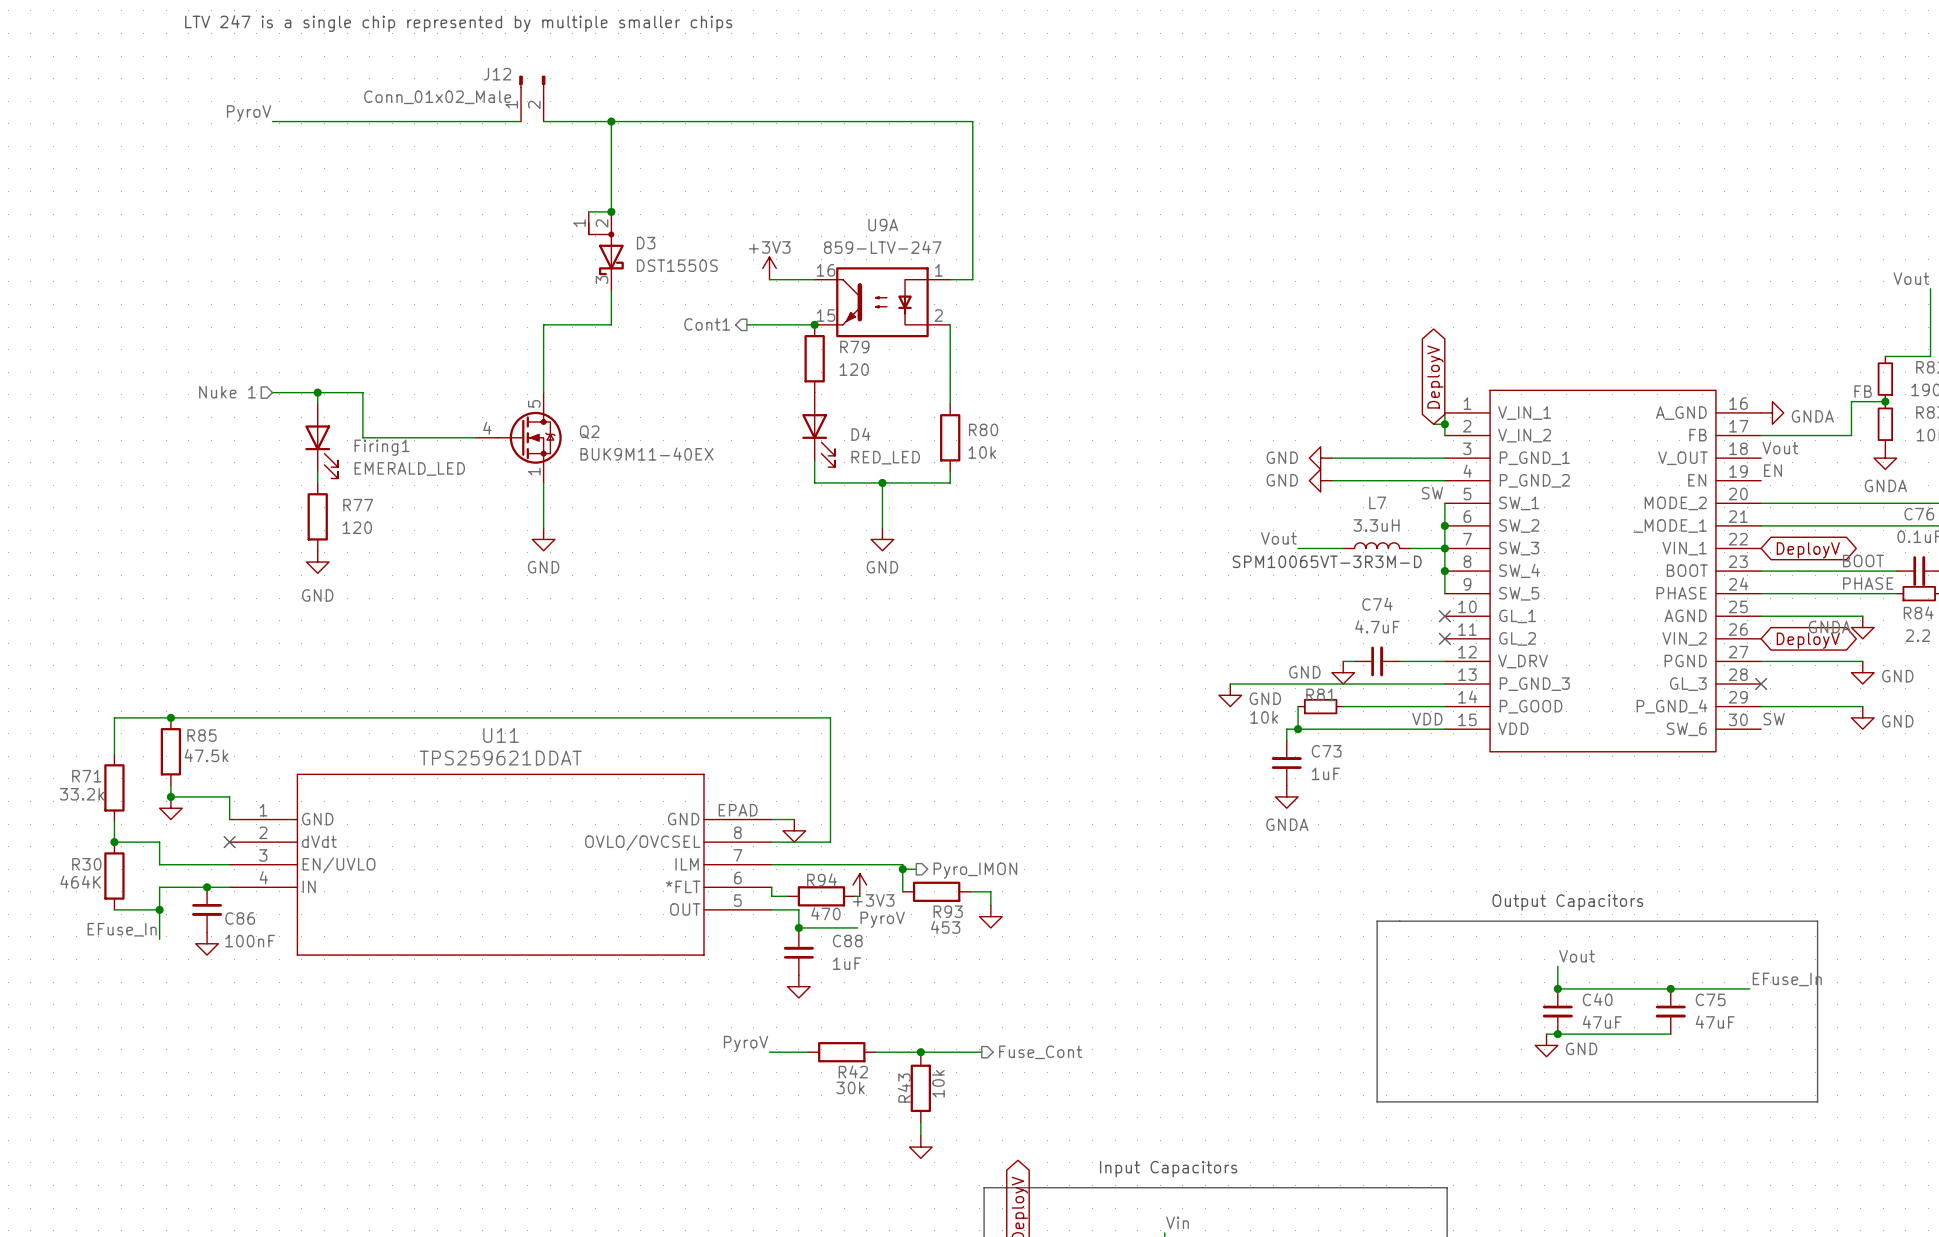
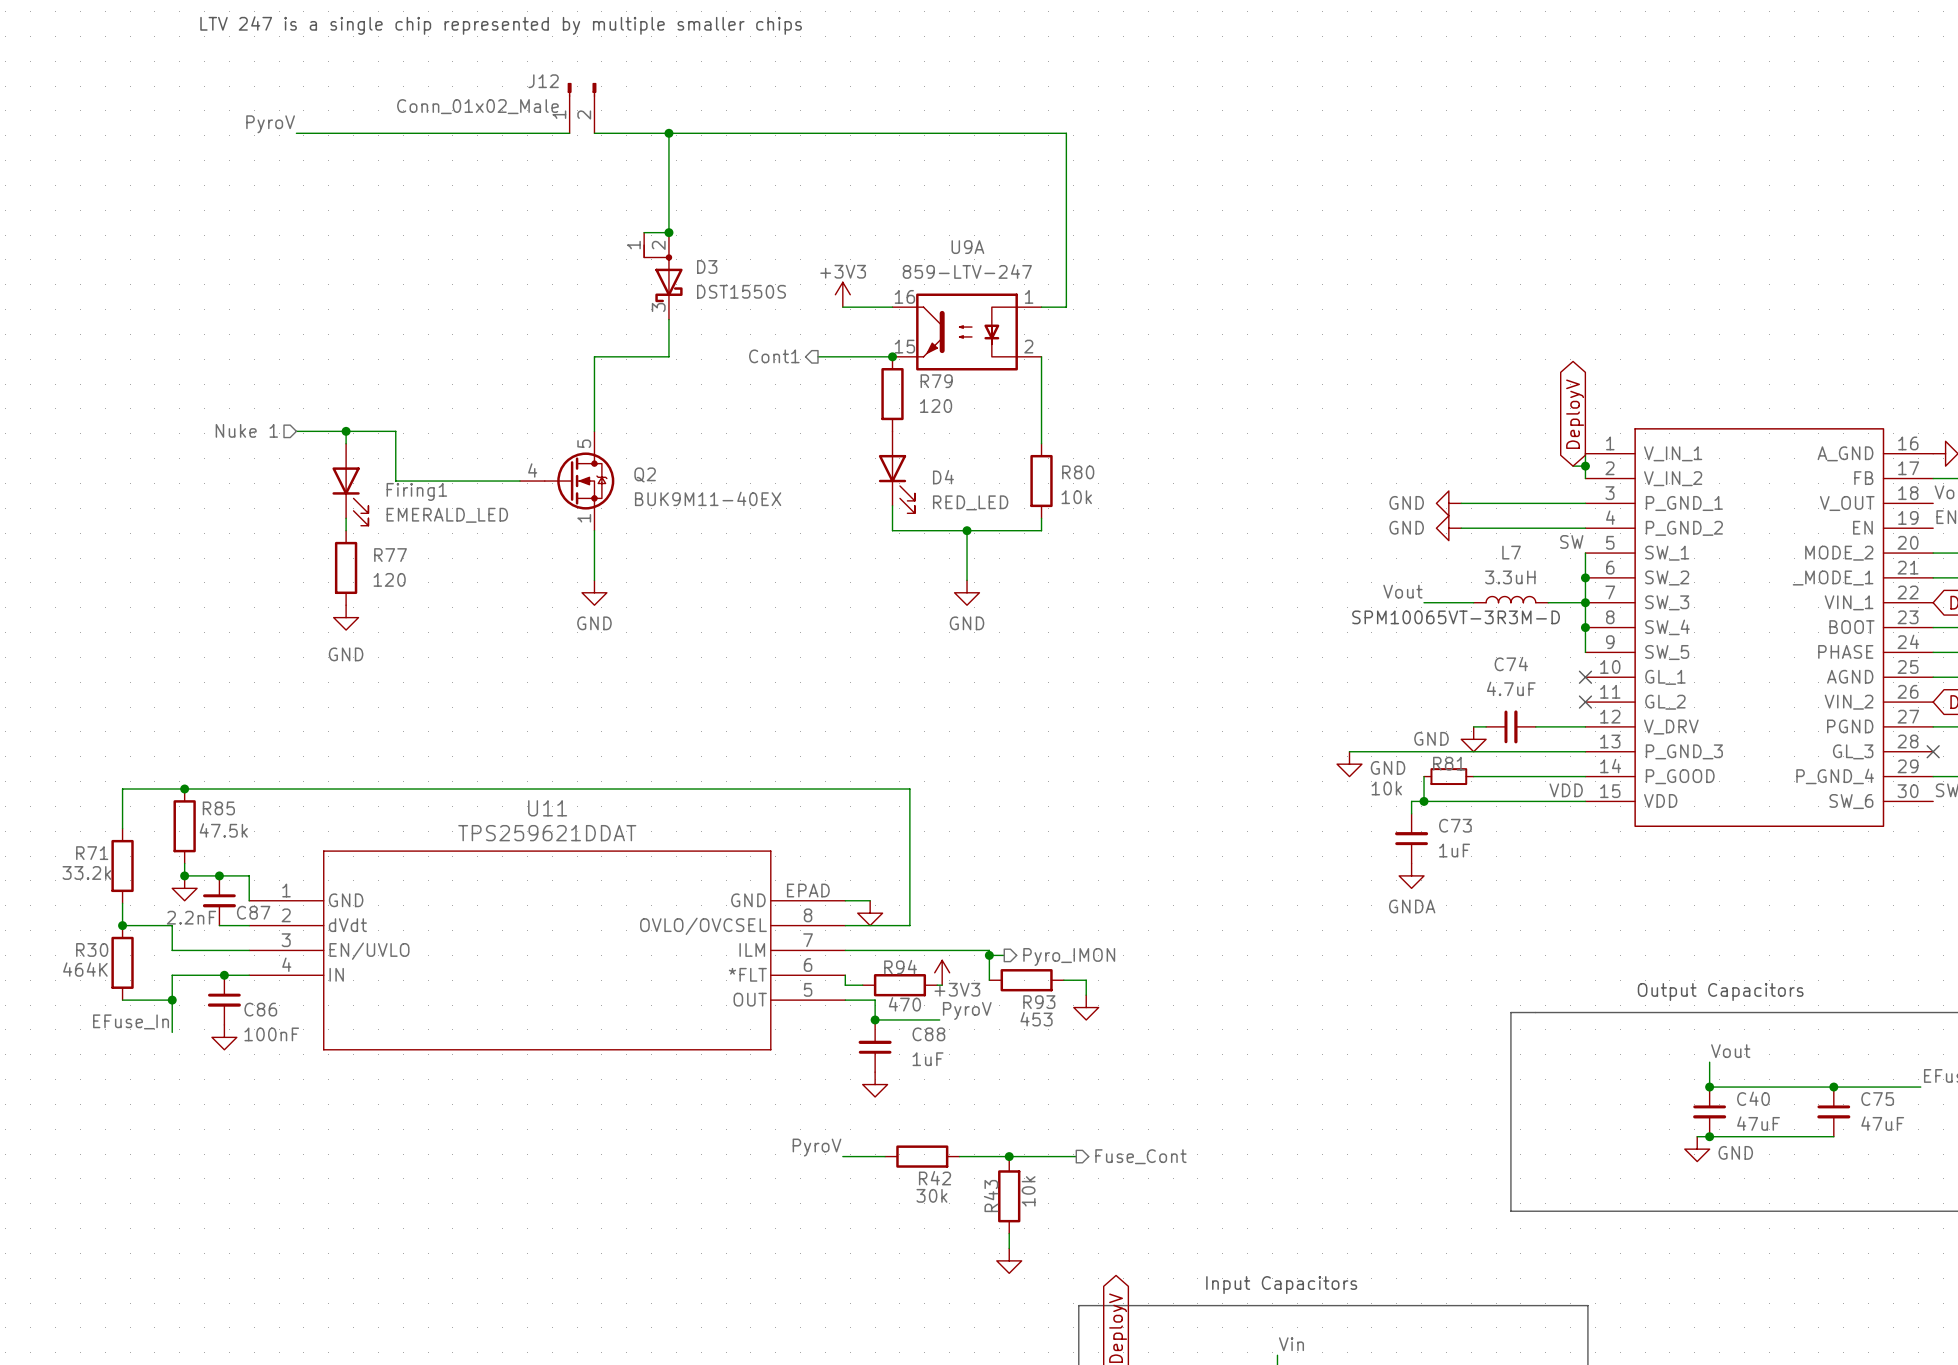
junction: none -> (219, 875)
C87: none -> 2.2nF (219, 900)
wire: none -> (219, 925) (249, 925)
no-connect mark: (229, 842) -> none

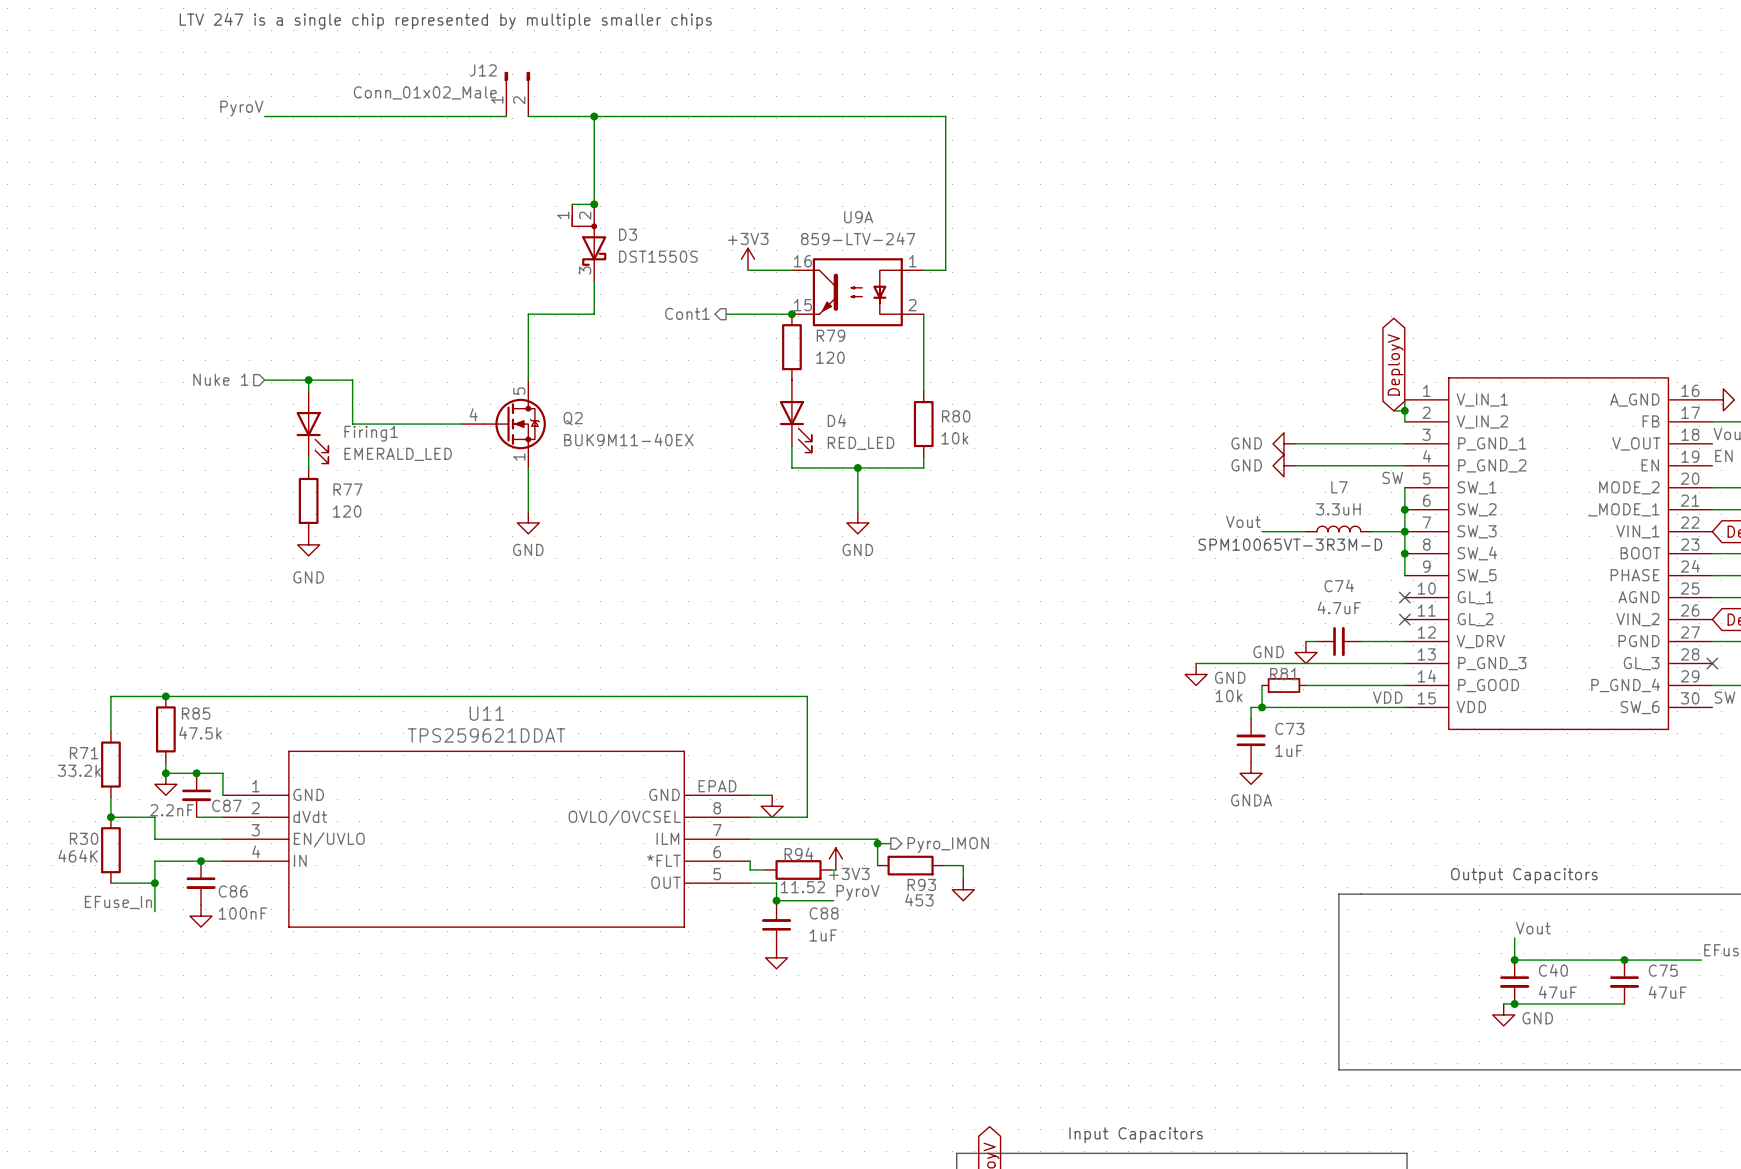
R94 value: 470 (904, 1004) -> 11.52 (802, 887)
label: PyroV (817, 1147) -> none
wire: (842, 1156) (885, 1156) -> none
R42: 30k (922, 1156) -> none
wire: (959, 1156) (1076, 1156) -> none
junction: (1009, 1156) -> none
hierarchical label: Fuse_Cont (1140, 1156) -> none
R43: 10k (1009, 1196) -> none
wire: (1009, 1233) (1009, 1248) -> none
power symbol: (1009, 1260) -> none

